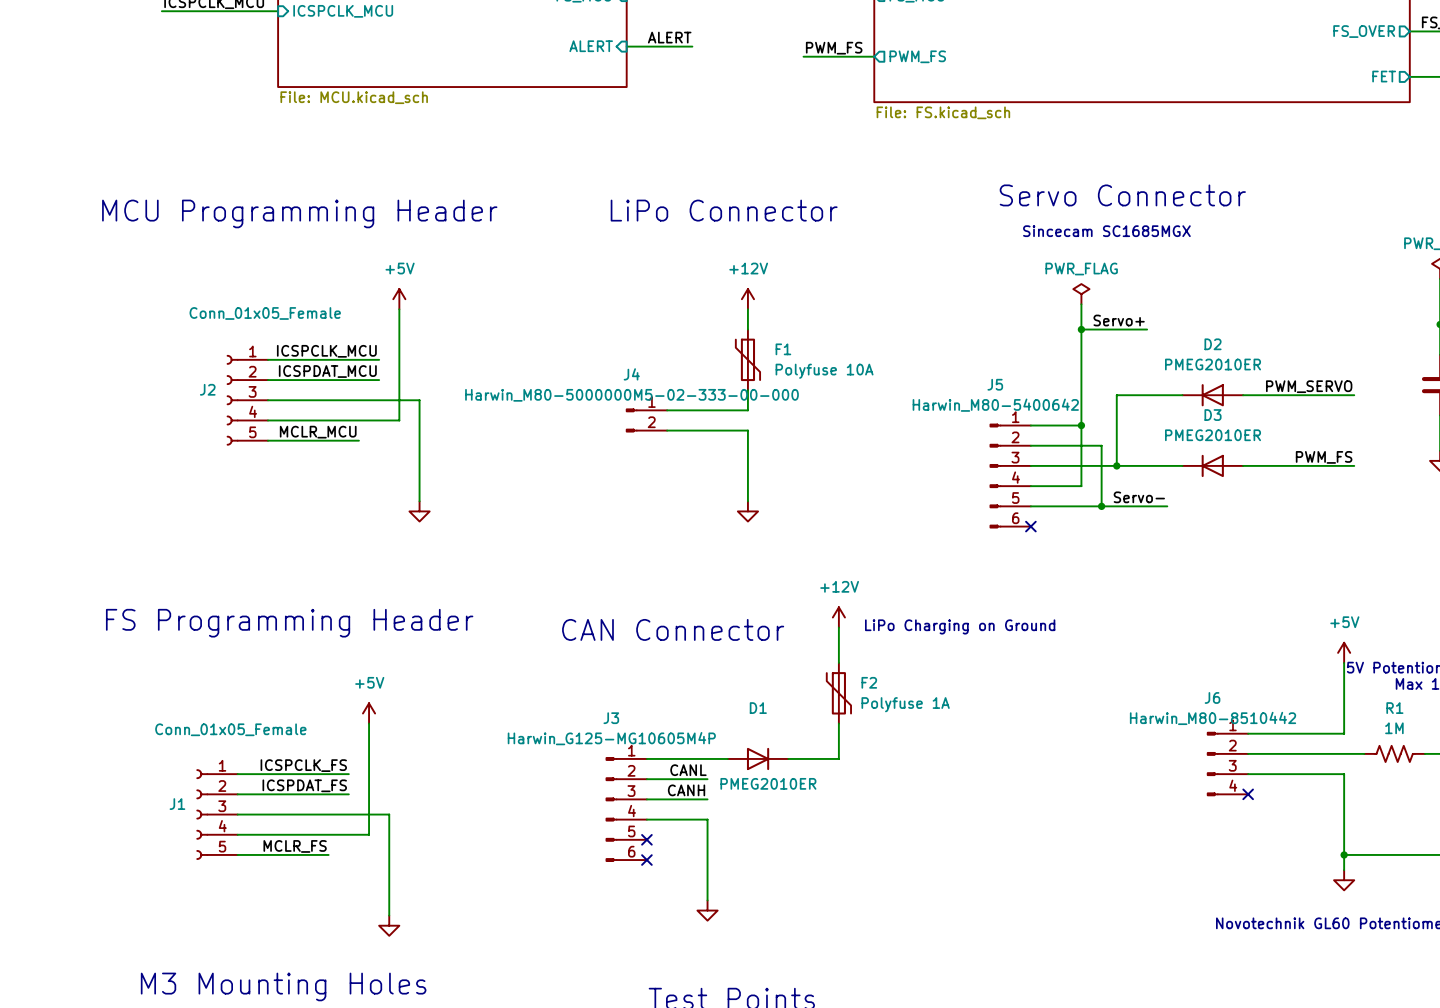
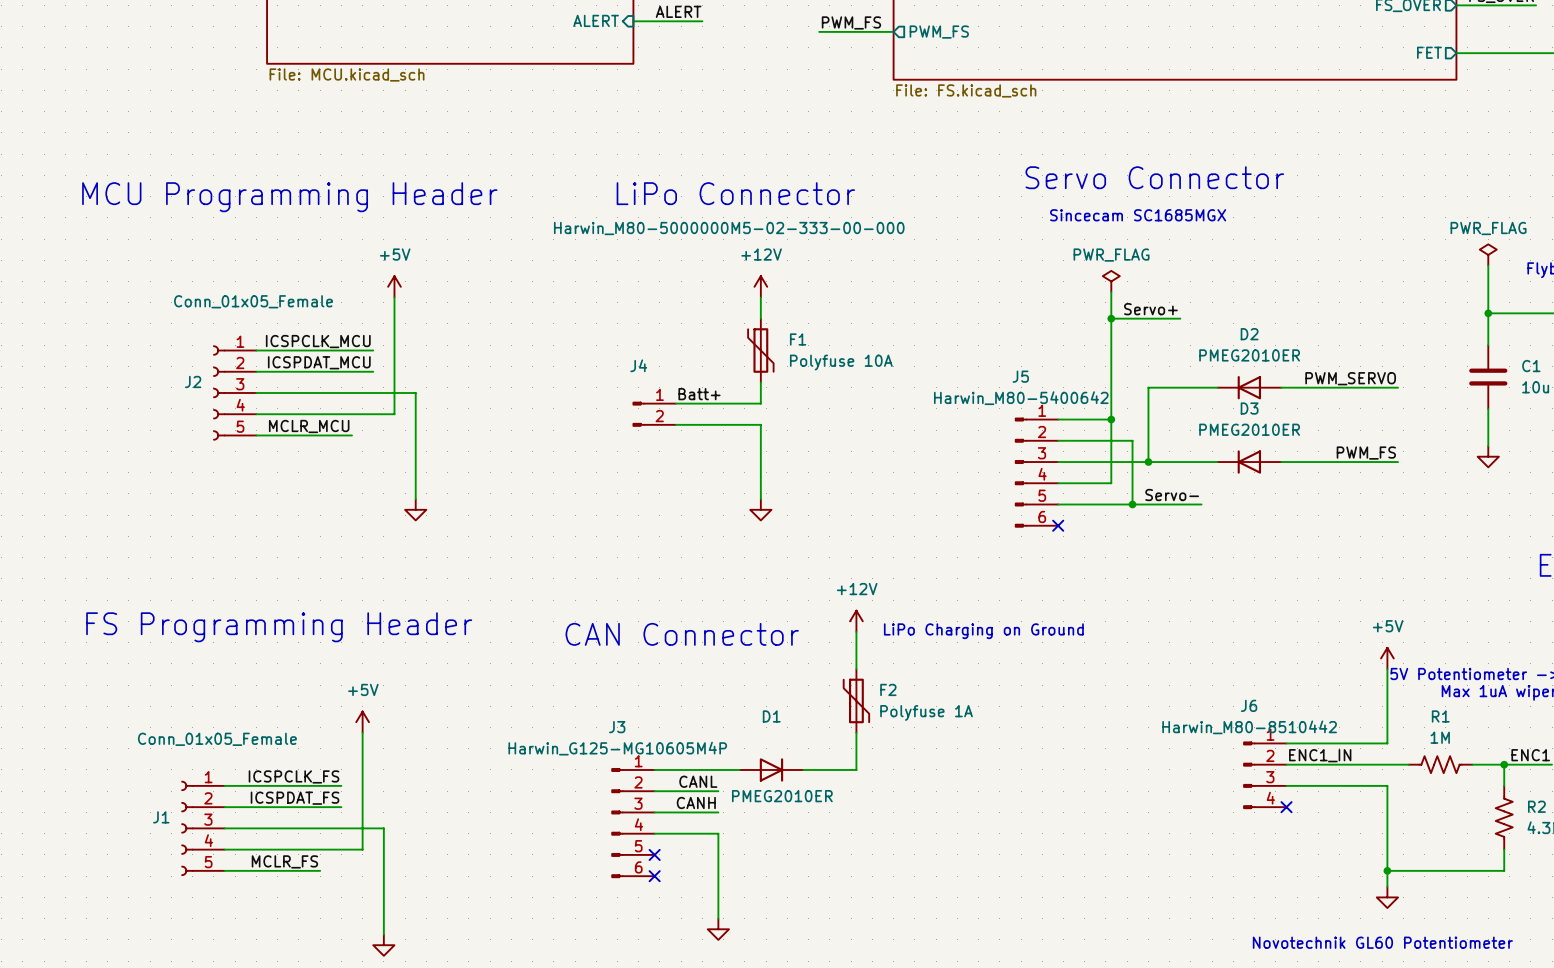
J4 value position: Harwin_M80-5000000M5-02-333-00-000 (631, 395) -> Harwin_M80-5000000M5-02-333-00-000 (729, 228)
label: none -> Batt+ (699, 394)
label: none -> ENC1_IN (1320, 755)

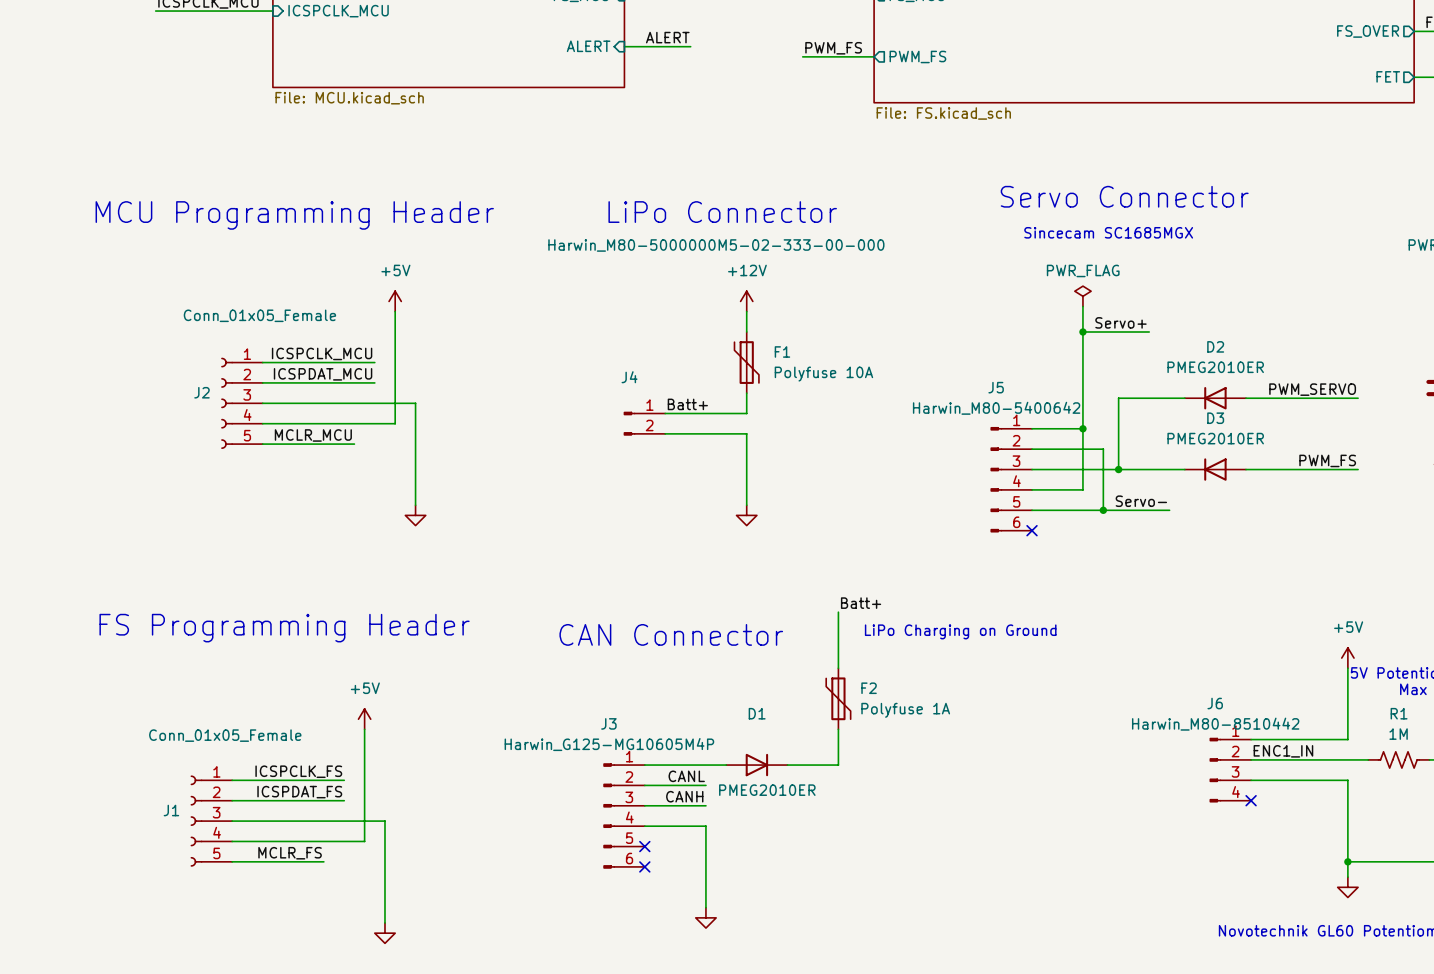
label: none -> Batt+ (861, 603)
power symbol: +12V (856, 621) -> none

